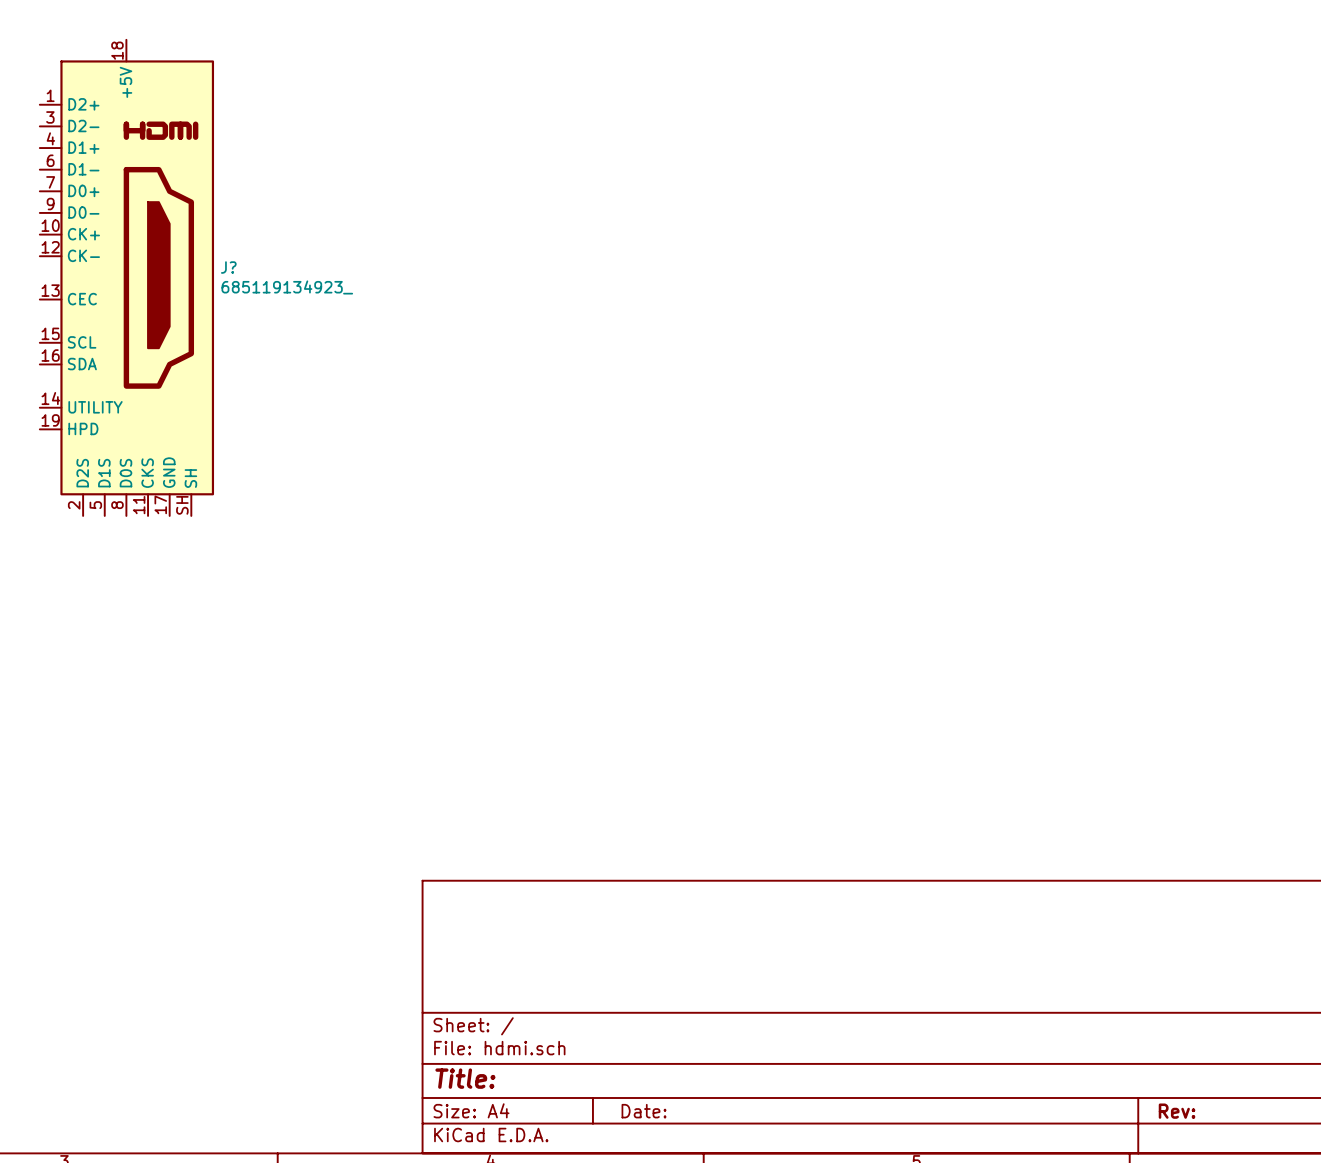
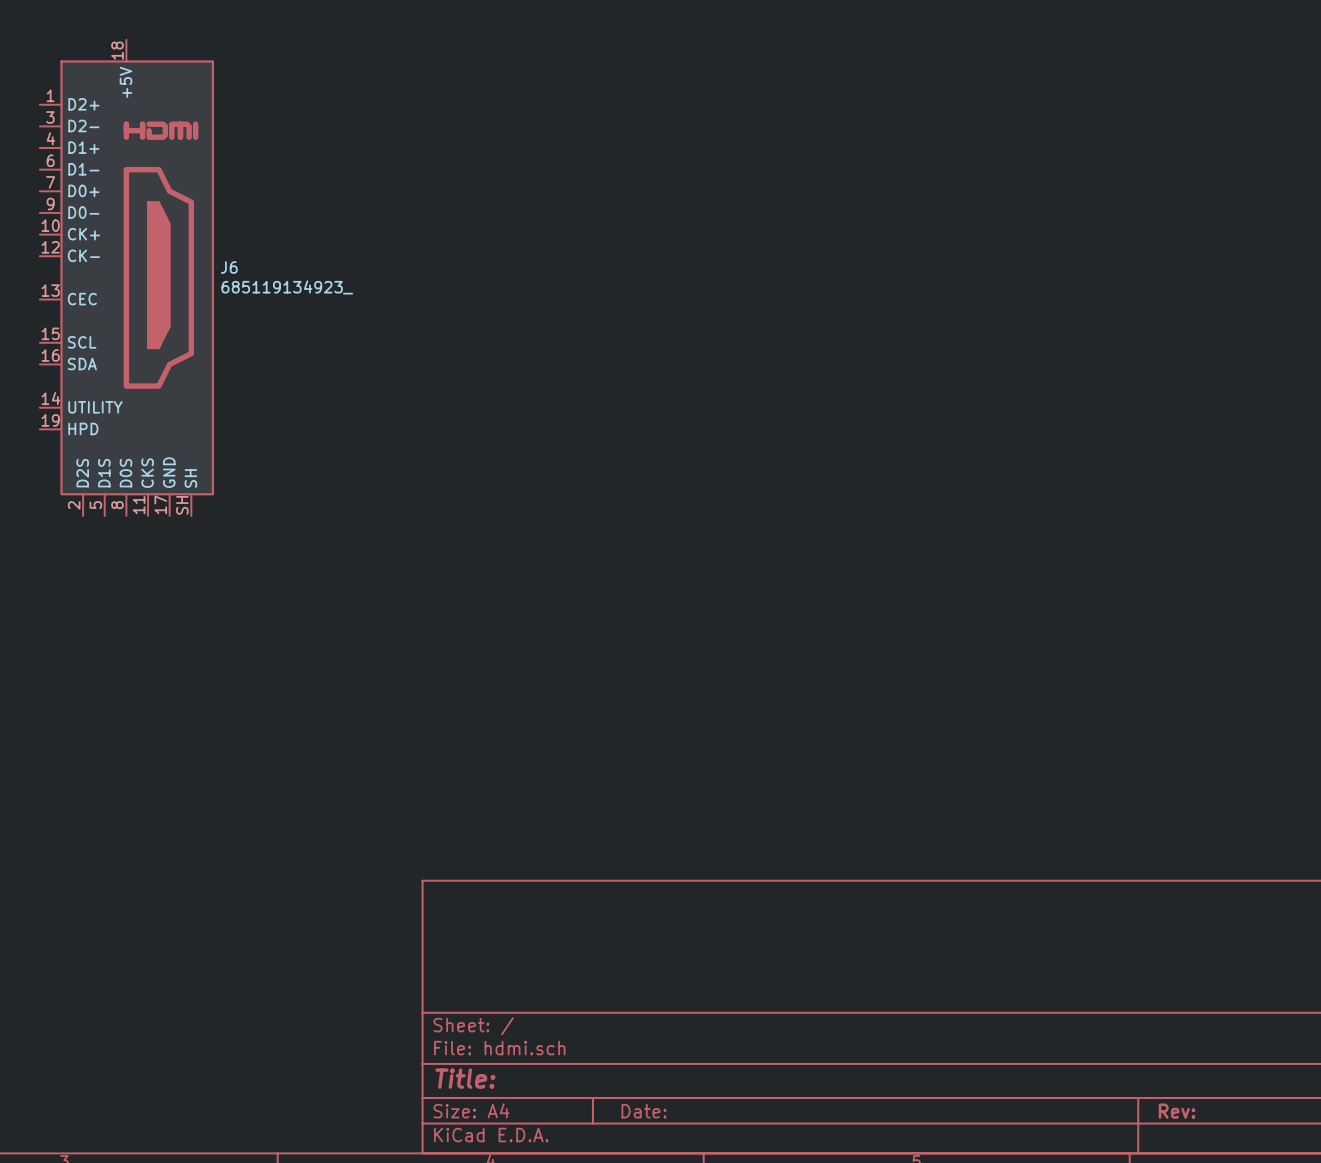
J? name: J? (228, 267) -> J6 (229, 267)

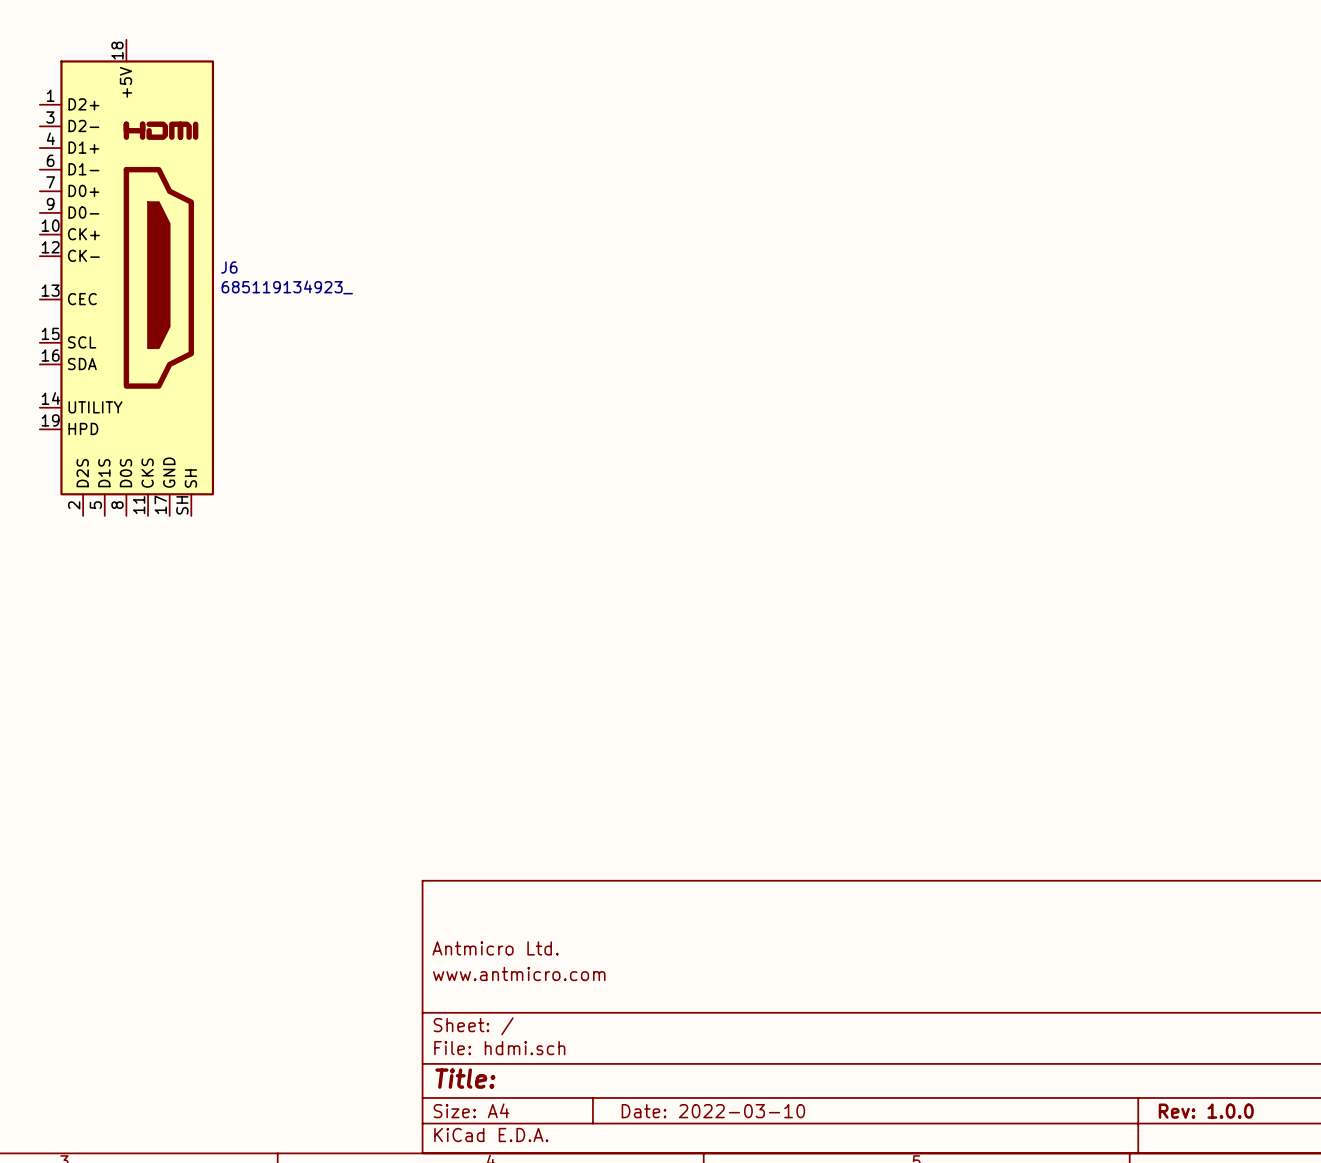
title block: none -> Antmicro Ltd. (495, 948)
title block: none -> www.antmicro.com (519, 973)
title block: Date: (644, 1111) -> Date: 2022-03-10 (713, 1111)
title block: Rev: (1177, 1111) -> Rev: 1.0.0 (1206, 1111)

